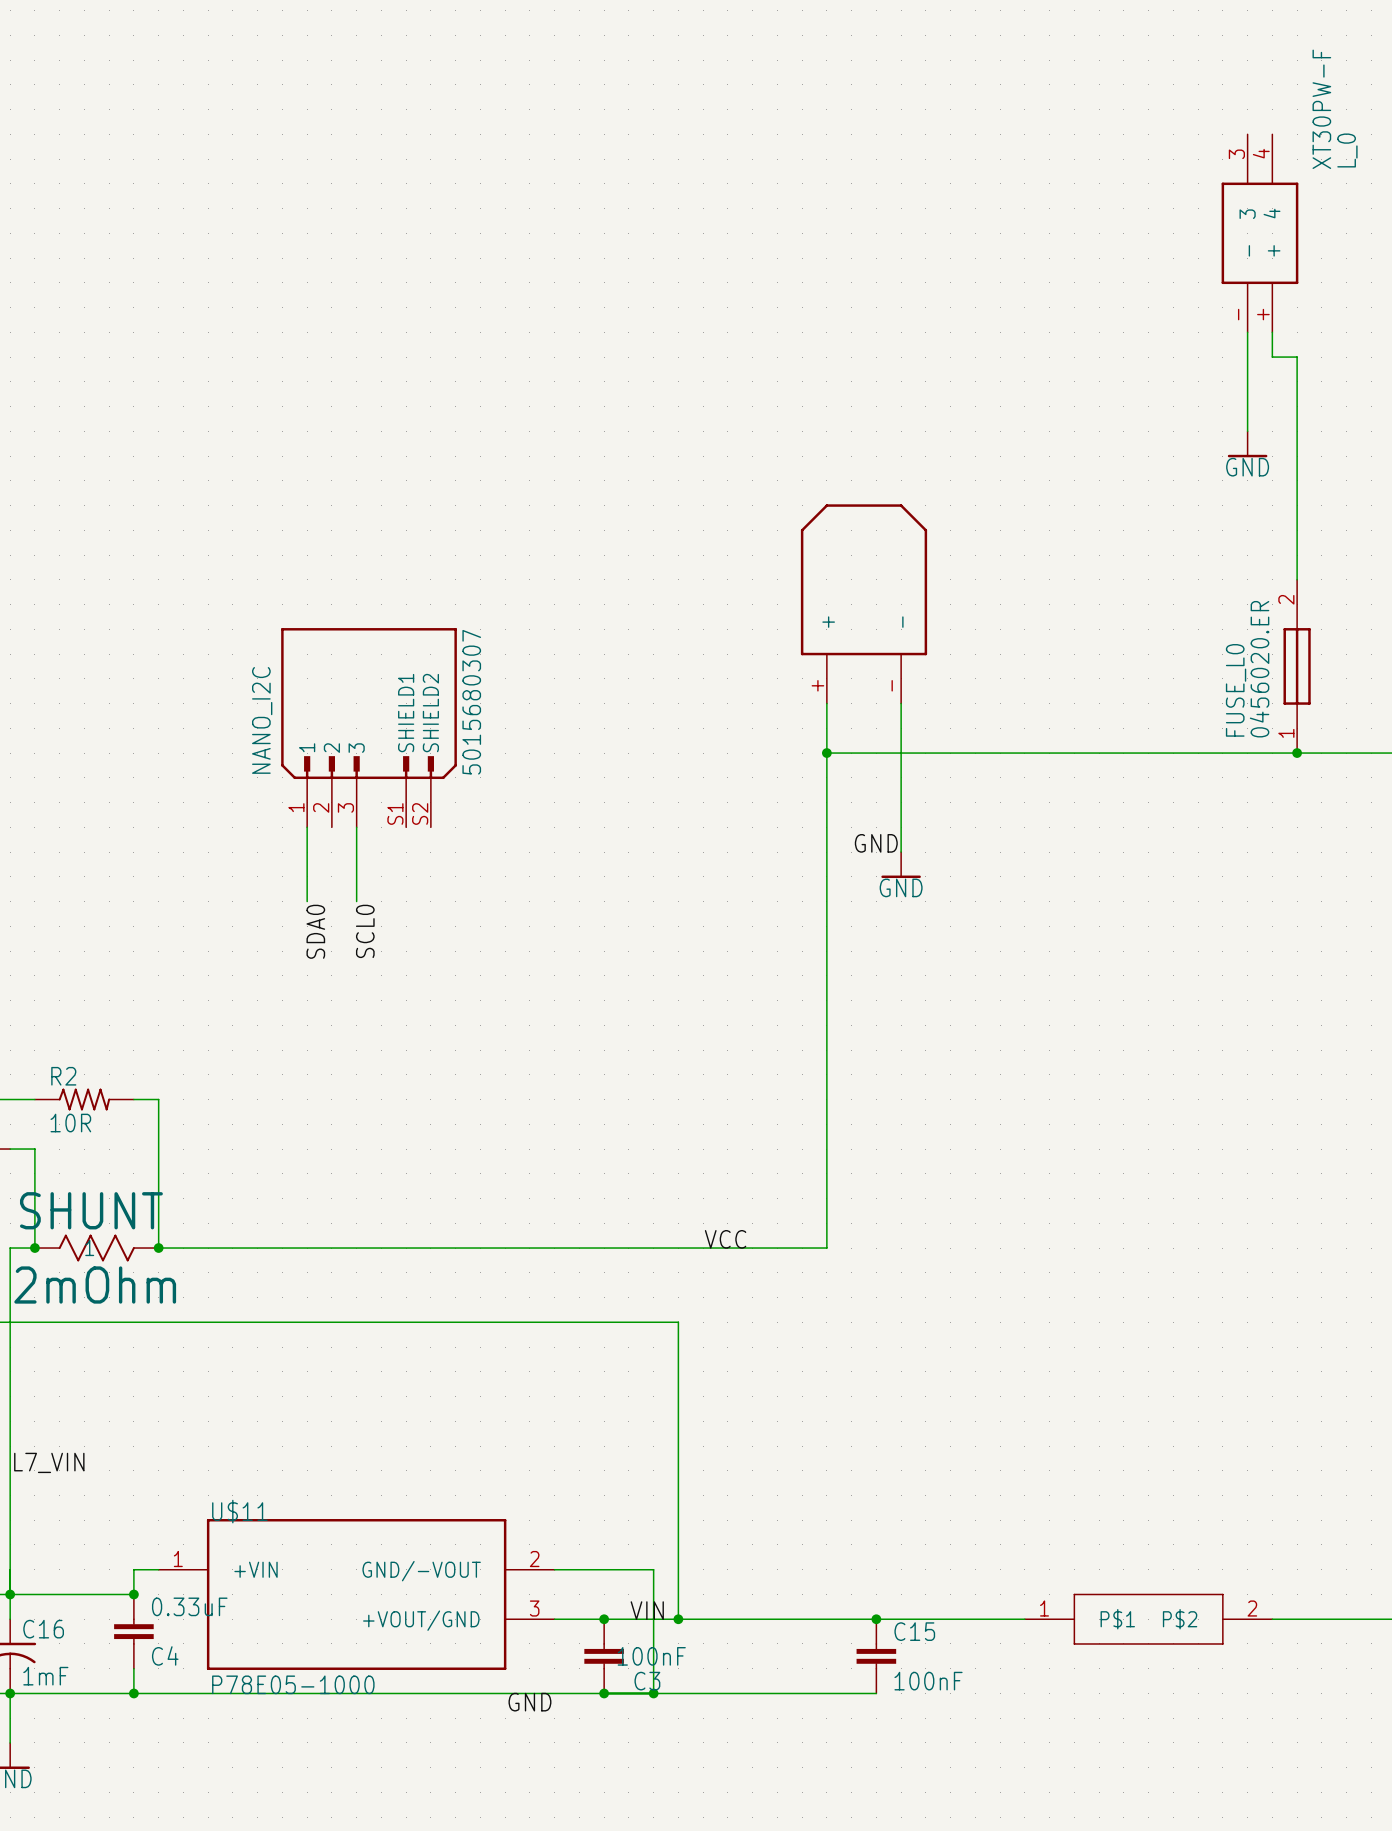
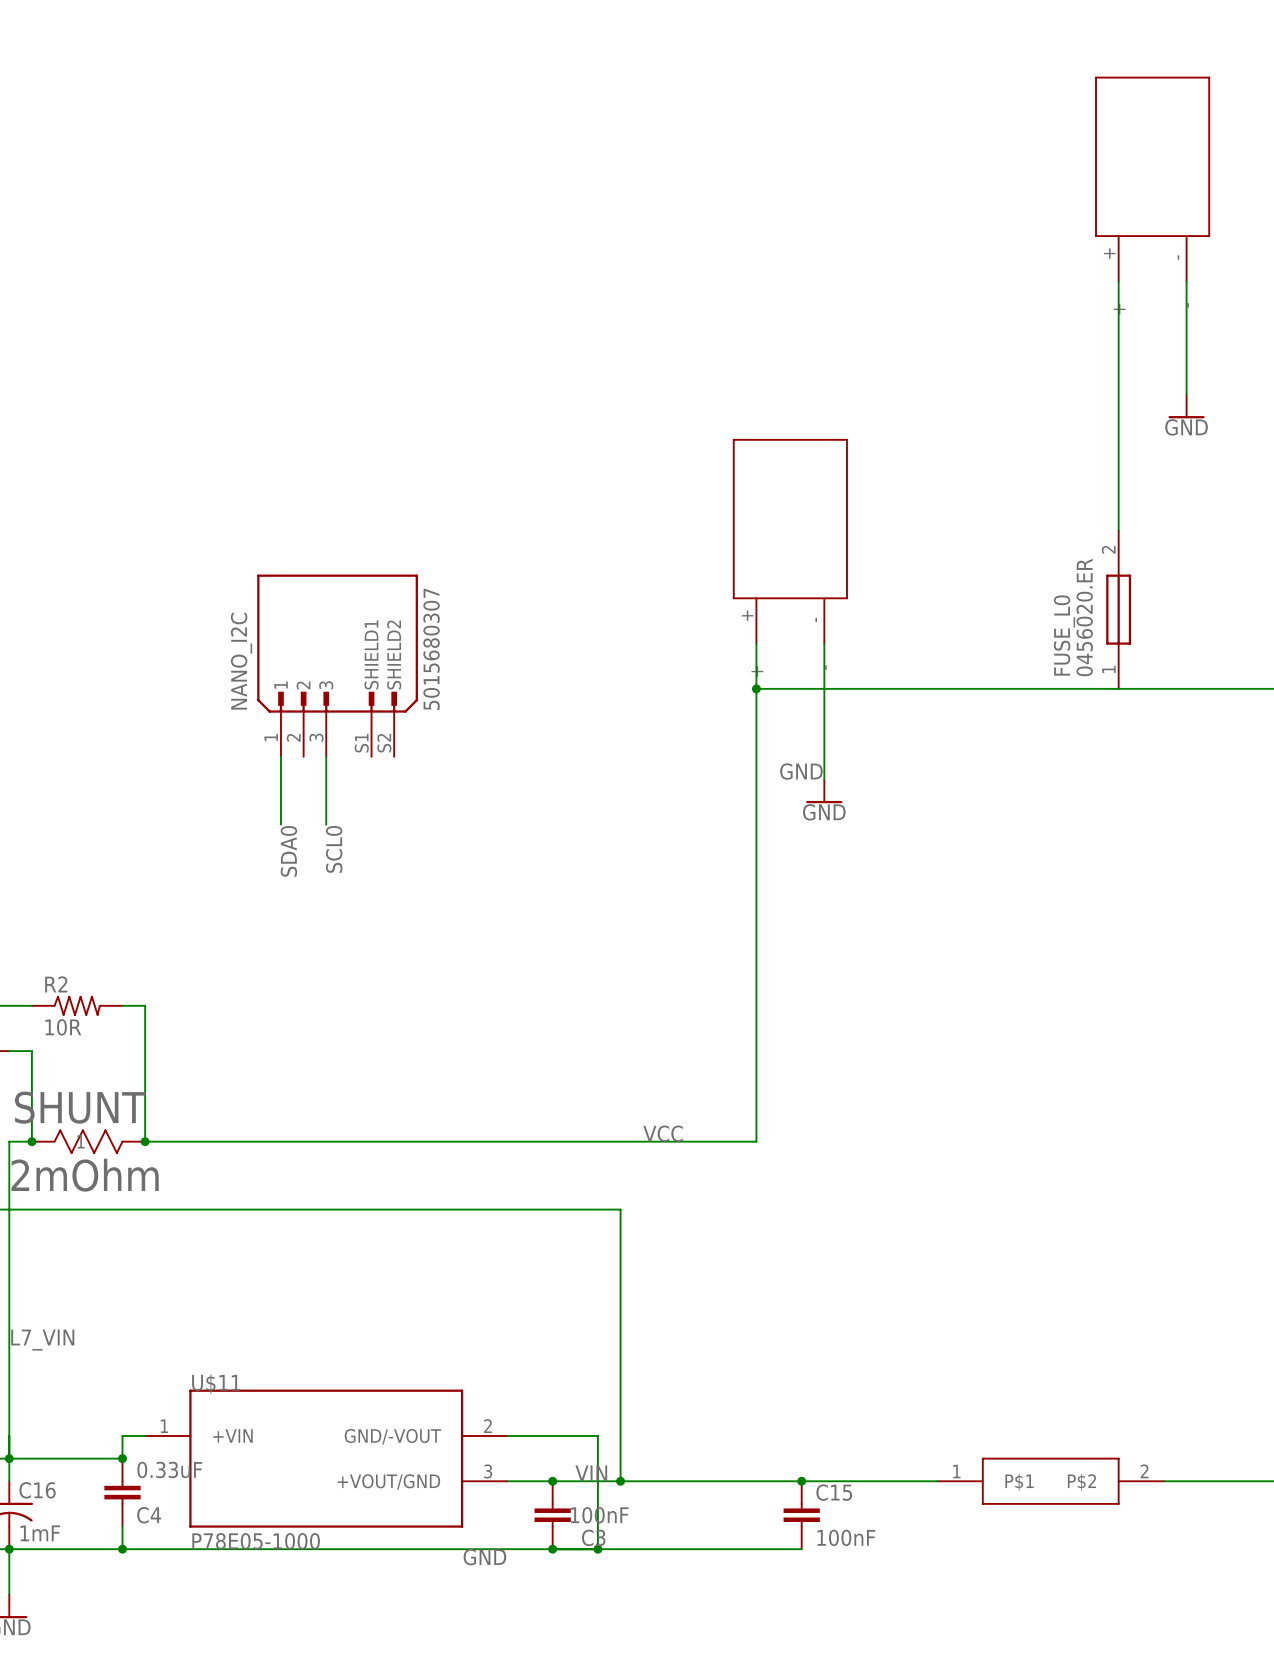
part: none -> (1152, 179)
L_0: XT30PW-F (1259, 233) -> none
wire: none -> (1118, 281) (1118, 530)
wire: (1247, 332) (1247, 431) -> none
wire: (1272, 332) (1272, 357) (1297, 357) -> (1186, 281) (1186, 326)
wire: (1297, 431) (1297, 579) -> none
power symbol position: GND (1247, 444) -> GND (1186, 406)
part: none -> (790, 541)
part: (864, 603) -> none
FUSE_L0 position: (1297, 666) -> (1118, 609)
junction: (1297, 753) -> none

